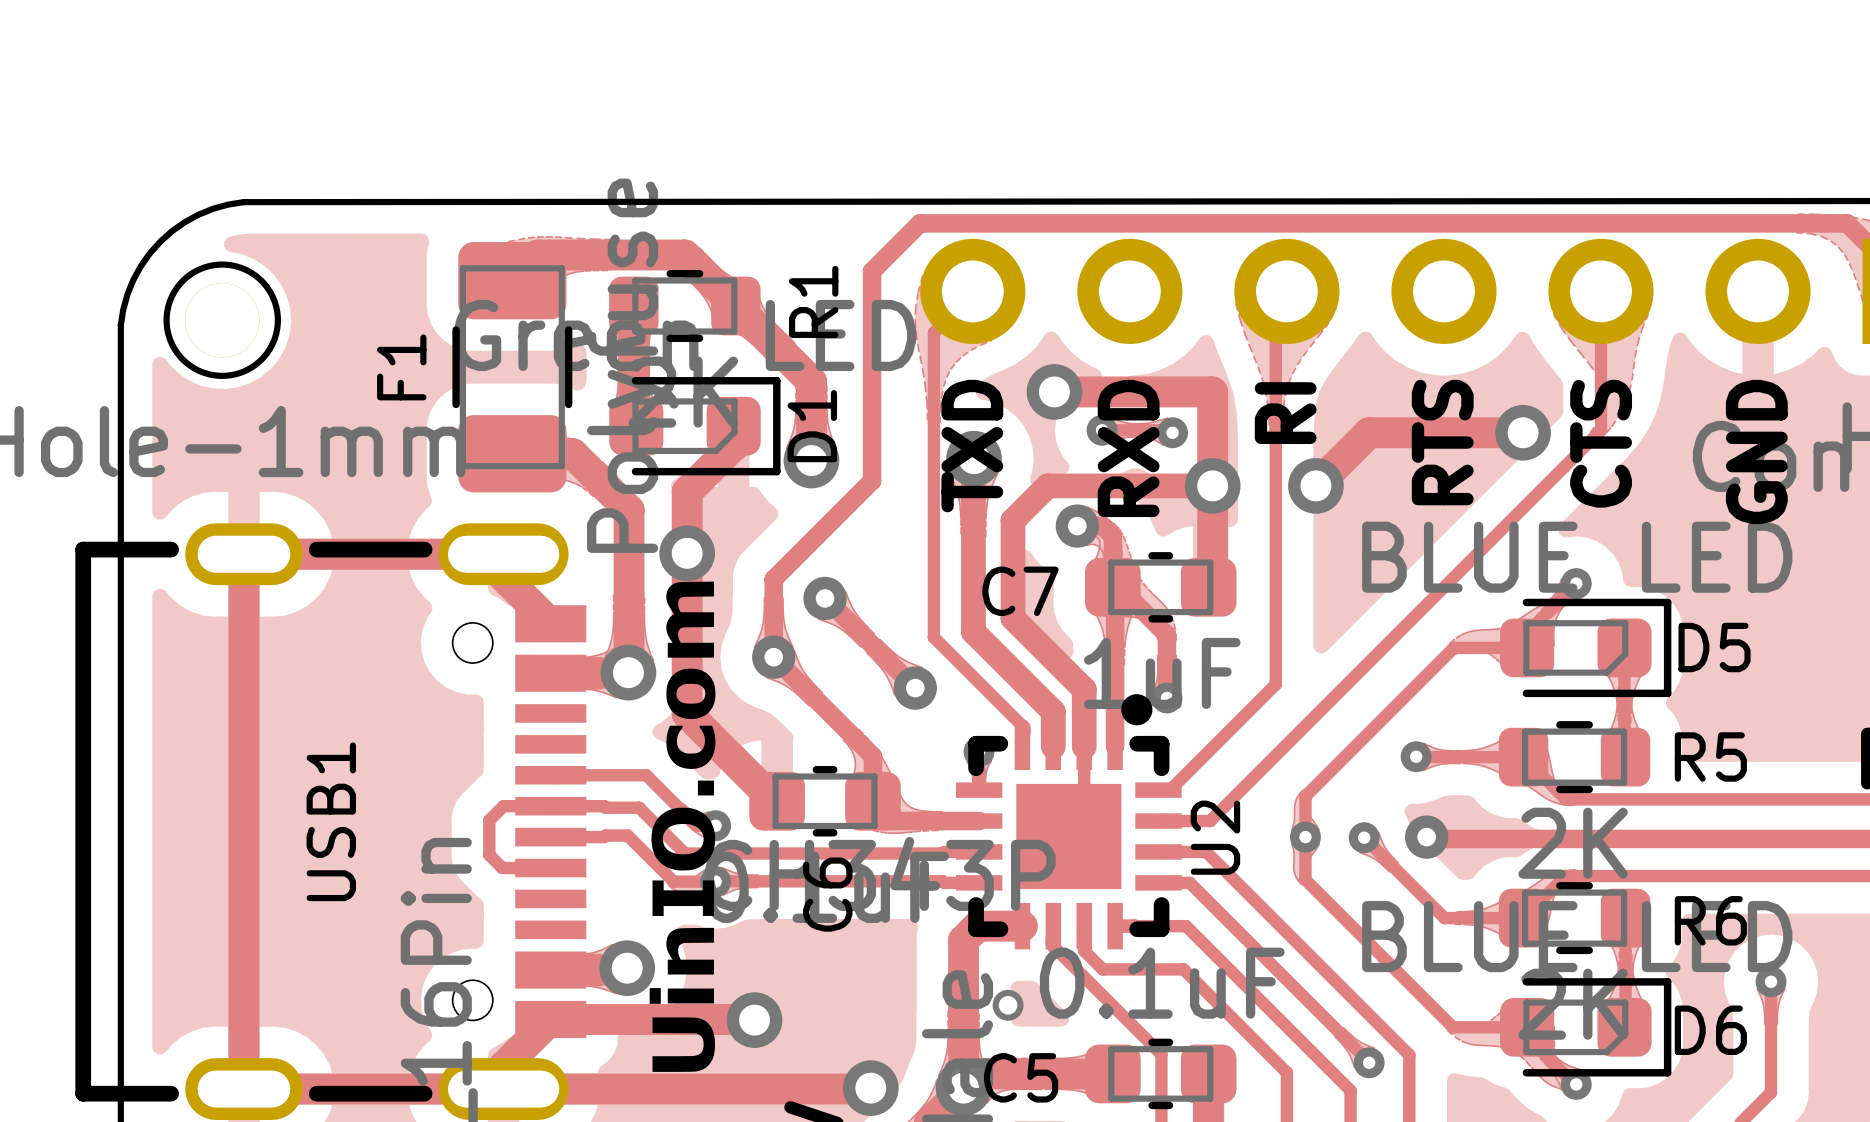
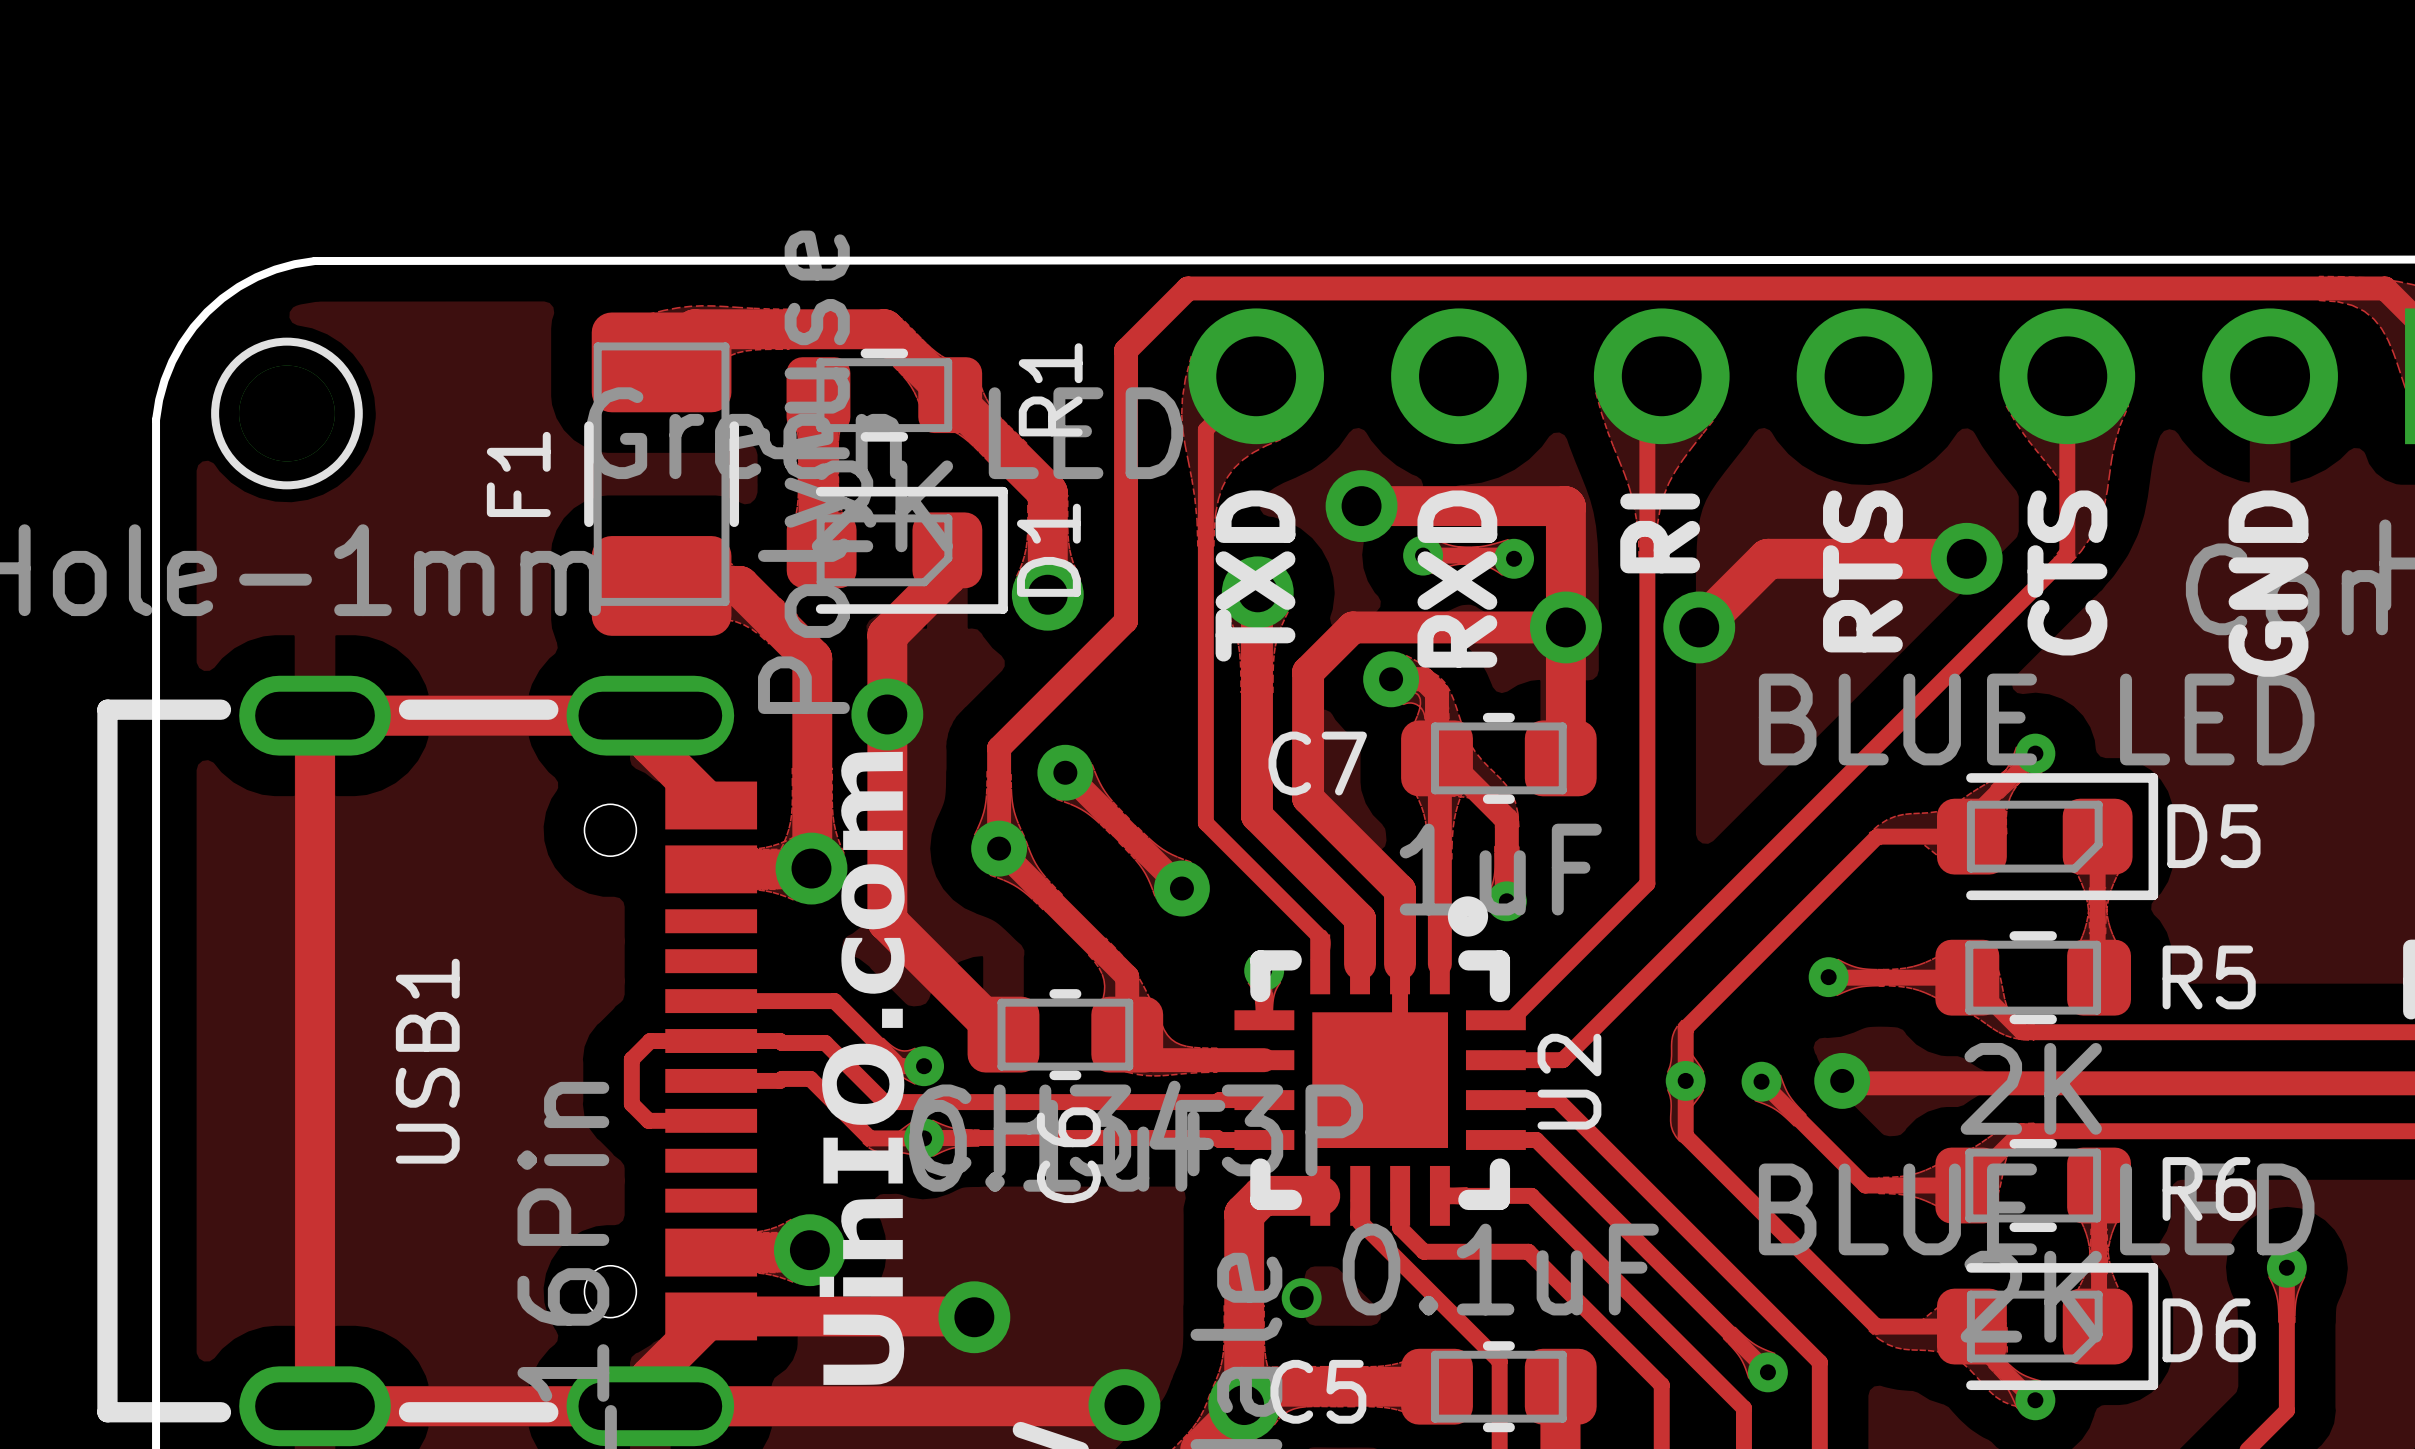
drawing position: (682, 826) -> (862, 1068)

